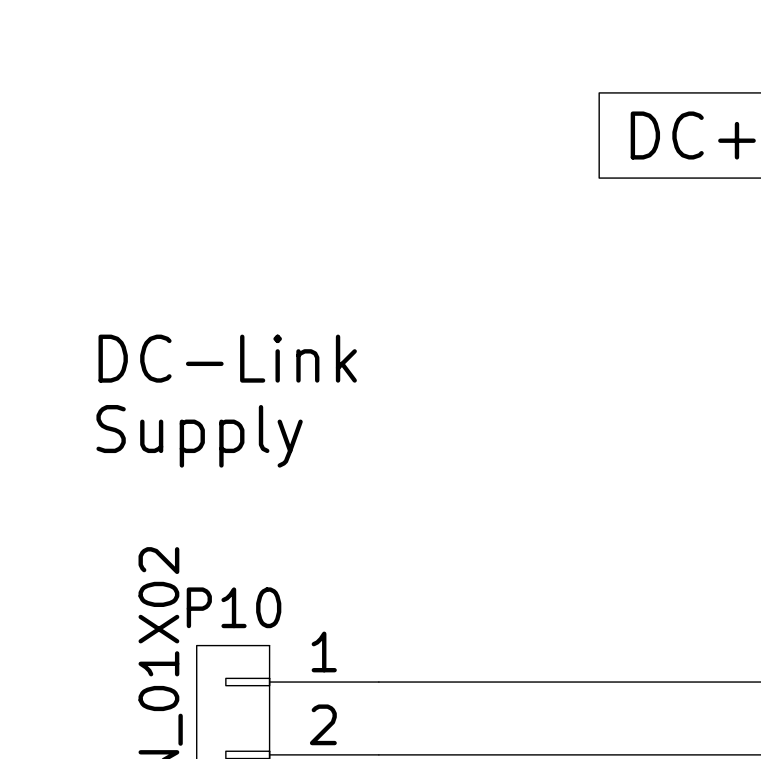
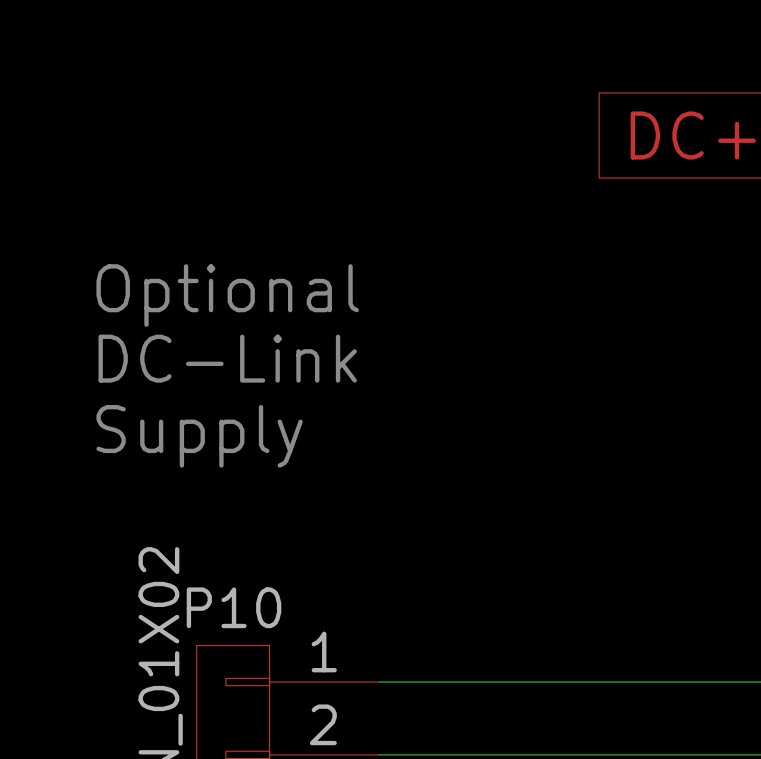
text: none -> Optional (227, 295)

